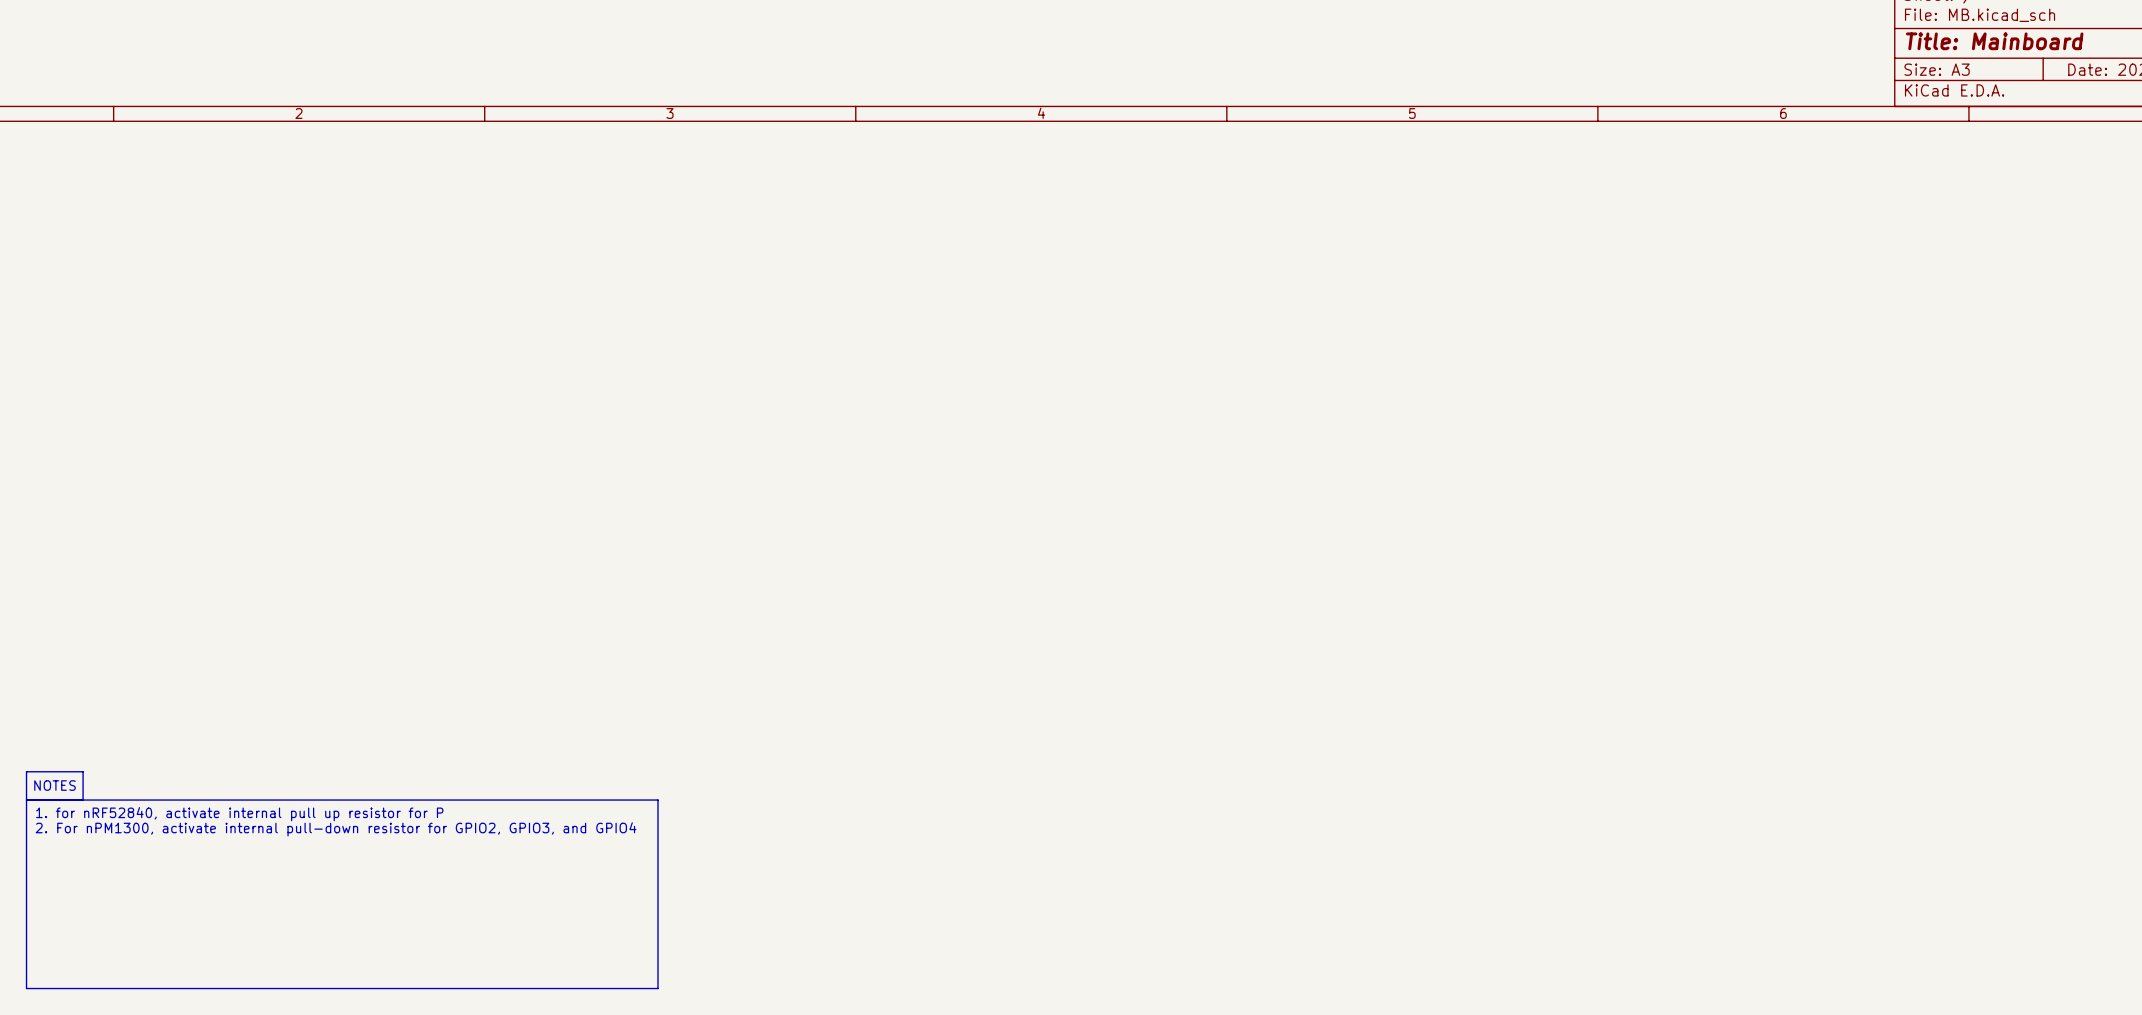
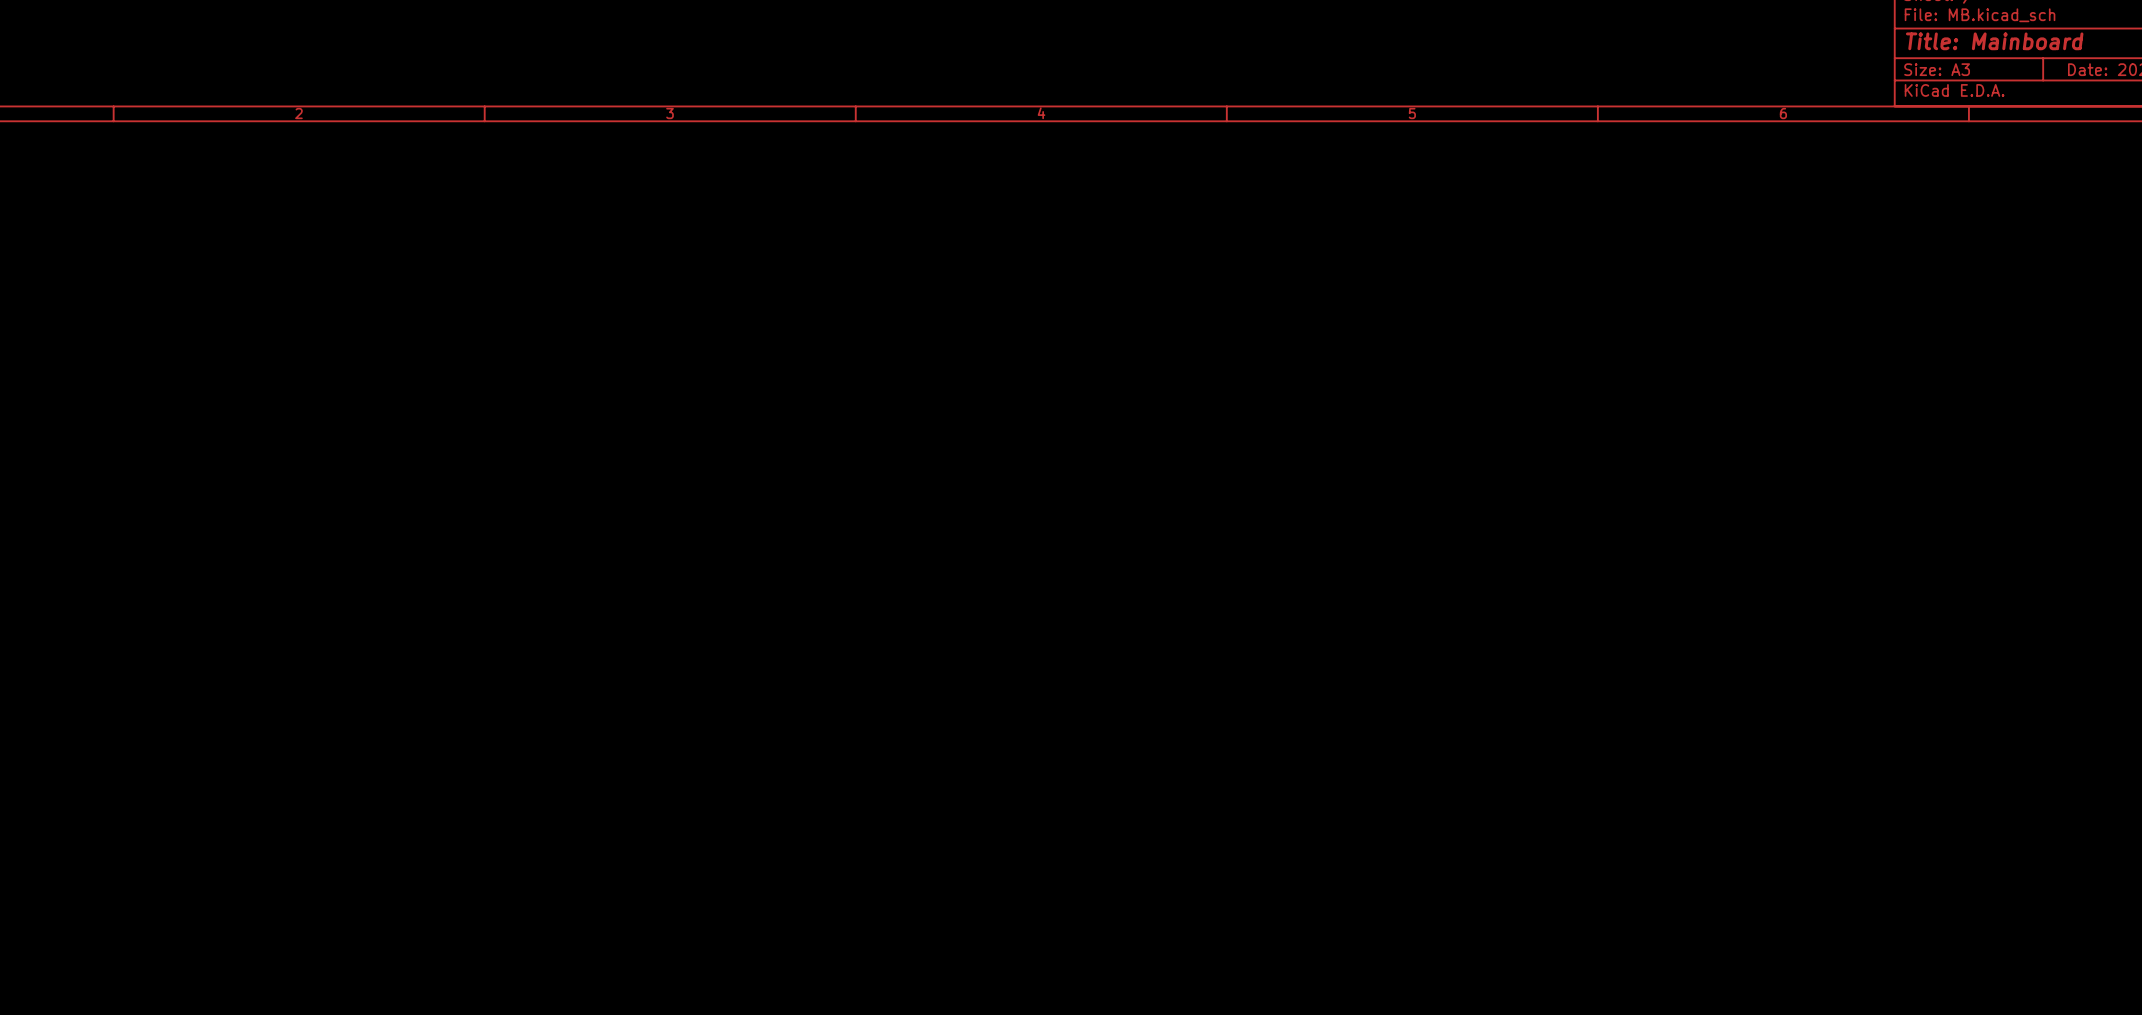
text: NOTES (55, 785) -> none
line: (26, 800) (657, 800) (657, 988) (26, 988) (26, 771) (83, 771) (83, 800) -> none
text: 1. for nRF52840, activate internal pull up resistor for P (239, 814) -> none
text: 2. For nPM1300, activate internal pull-down resistor for GPIO2, GPIO3, and GPIO4 (336, 829) -> none

